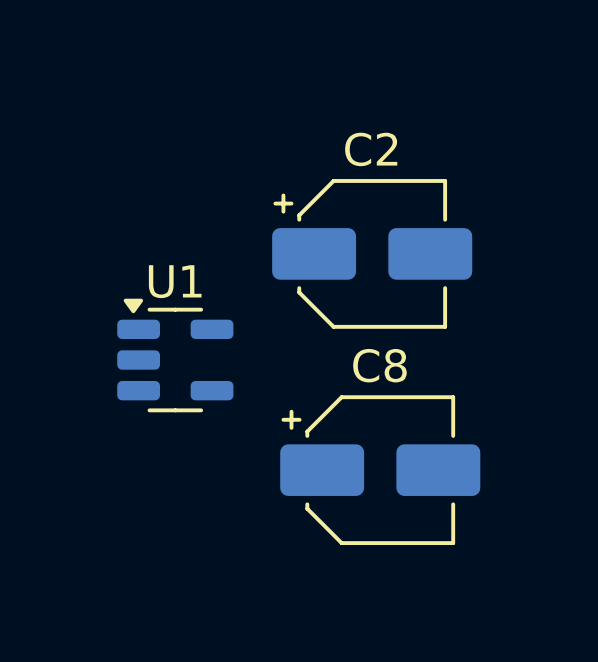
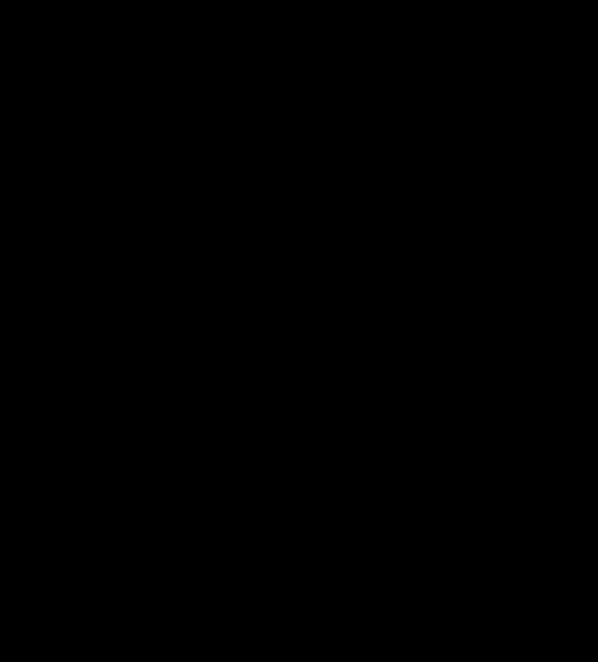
C2: (372, 253) -> none
U1: (175, 355) -> none
C8: (380, 470) -> none

